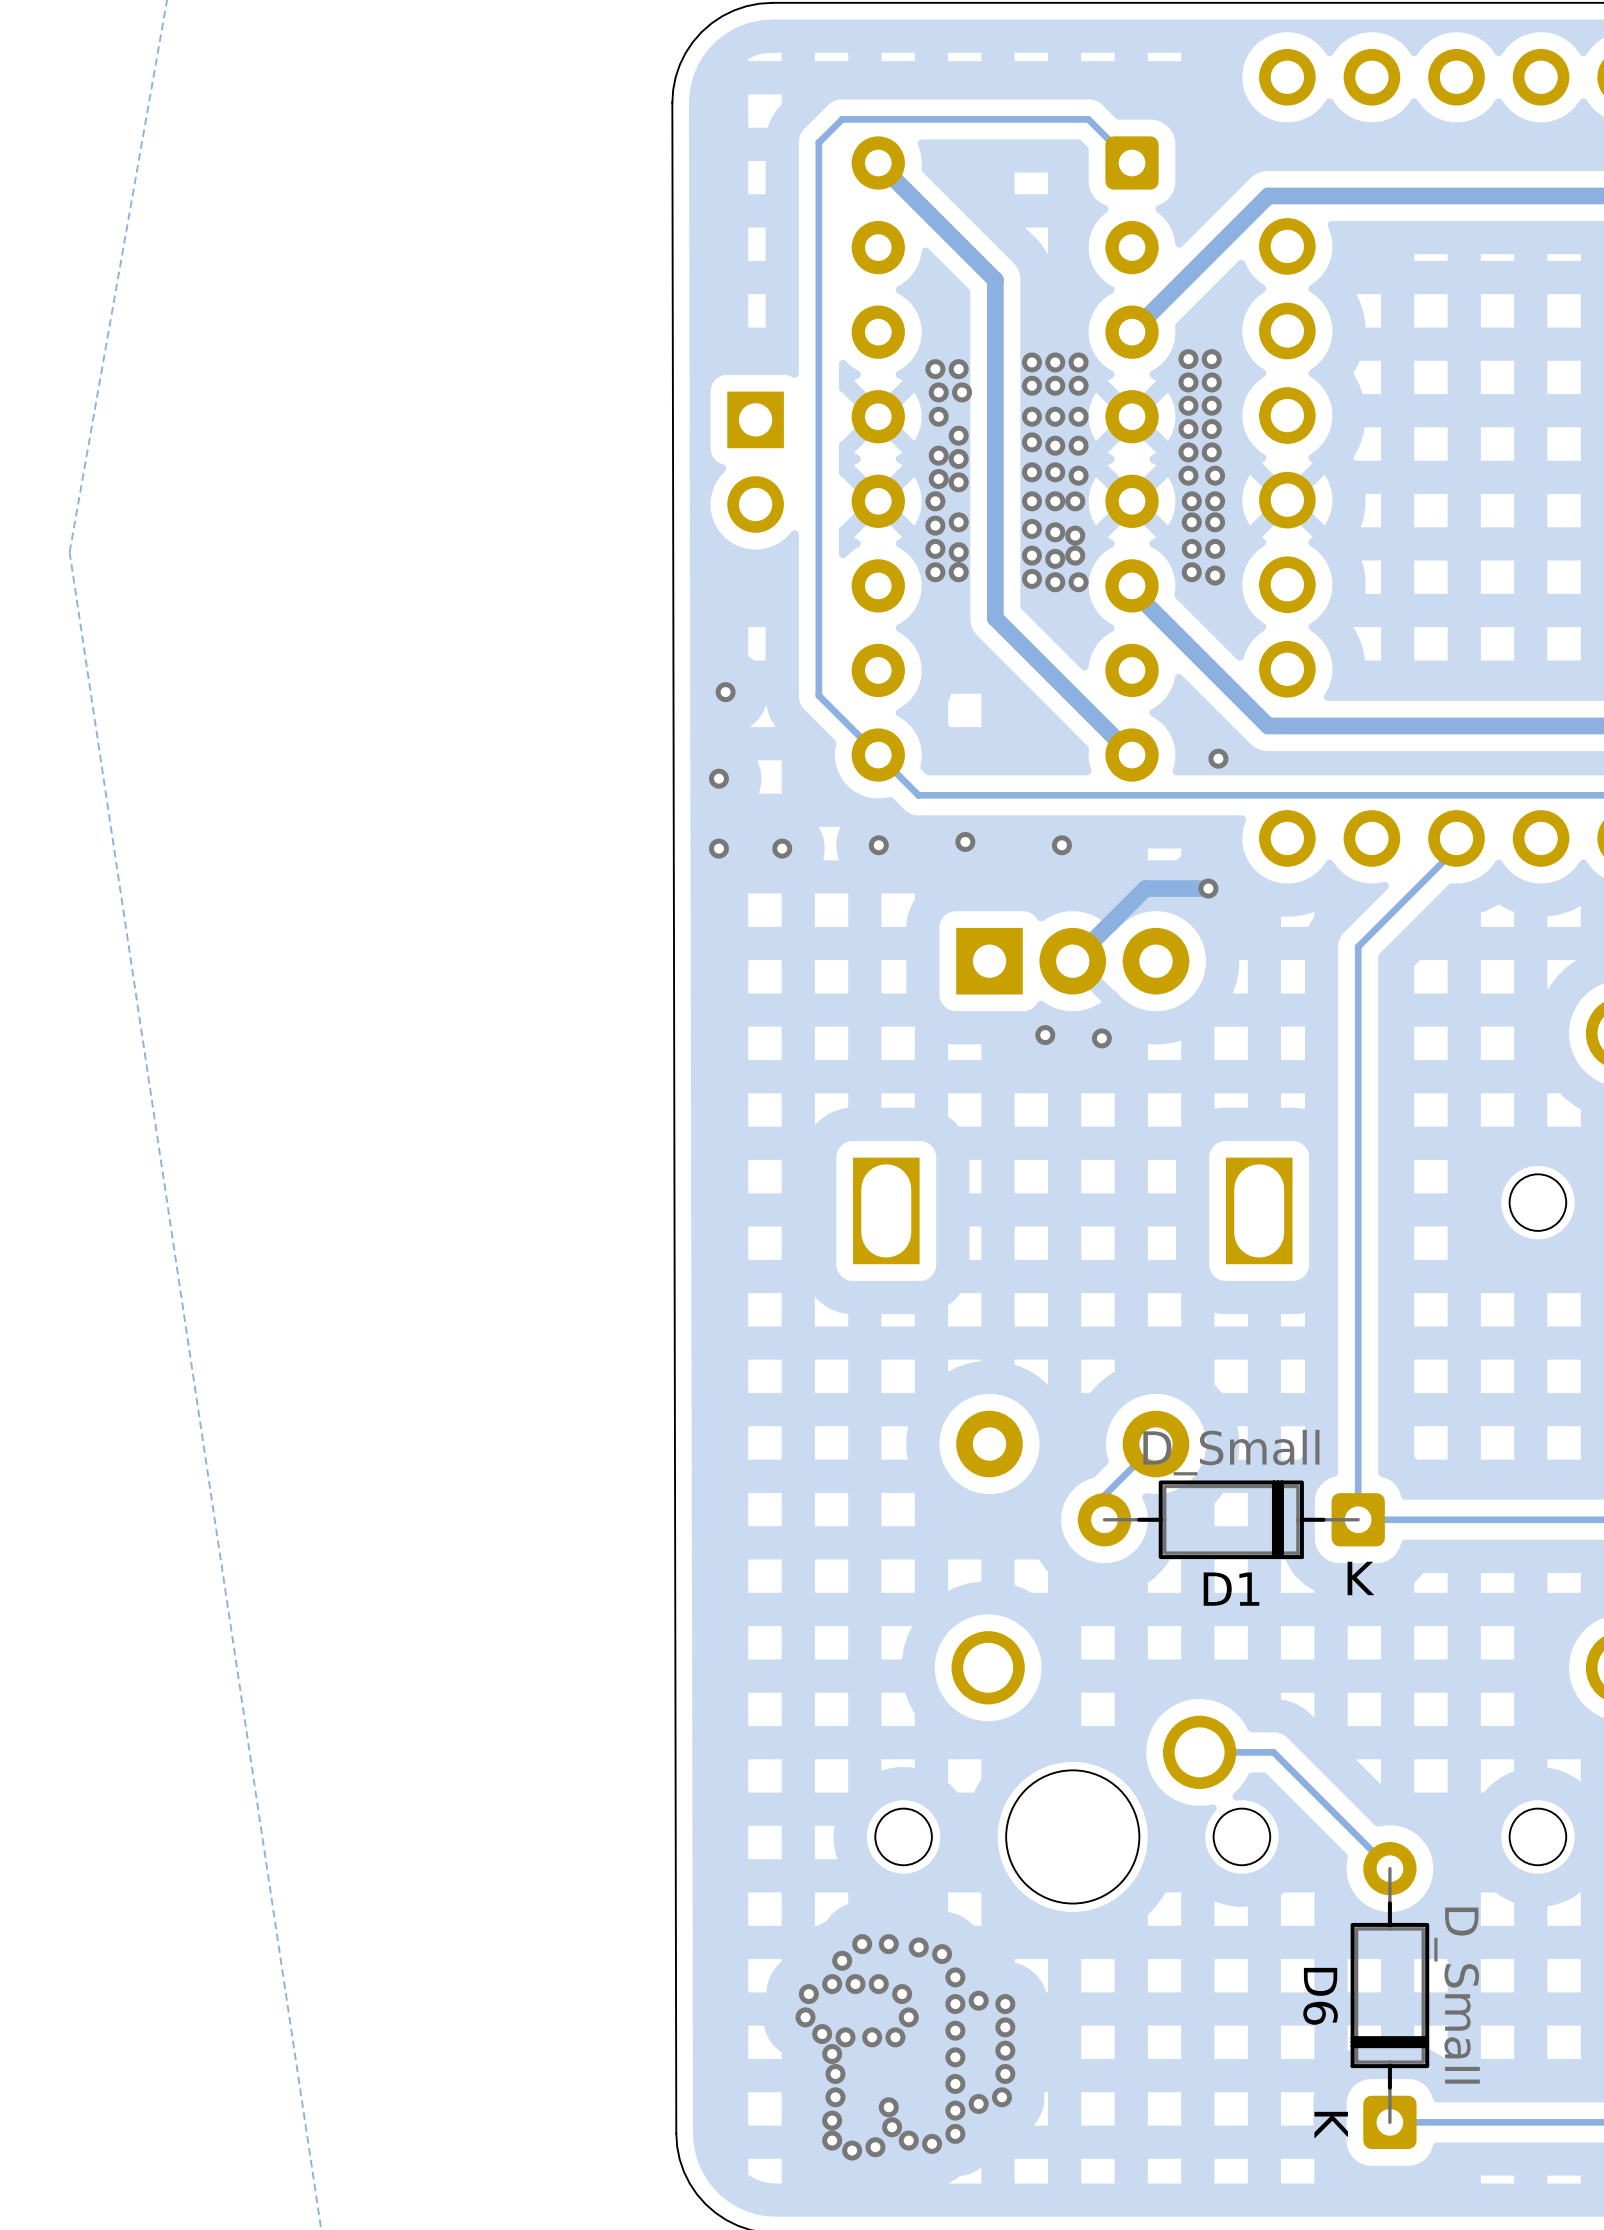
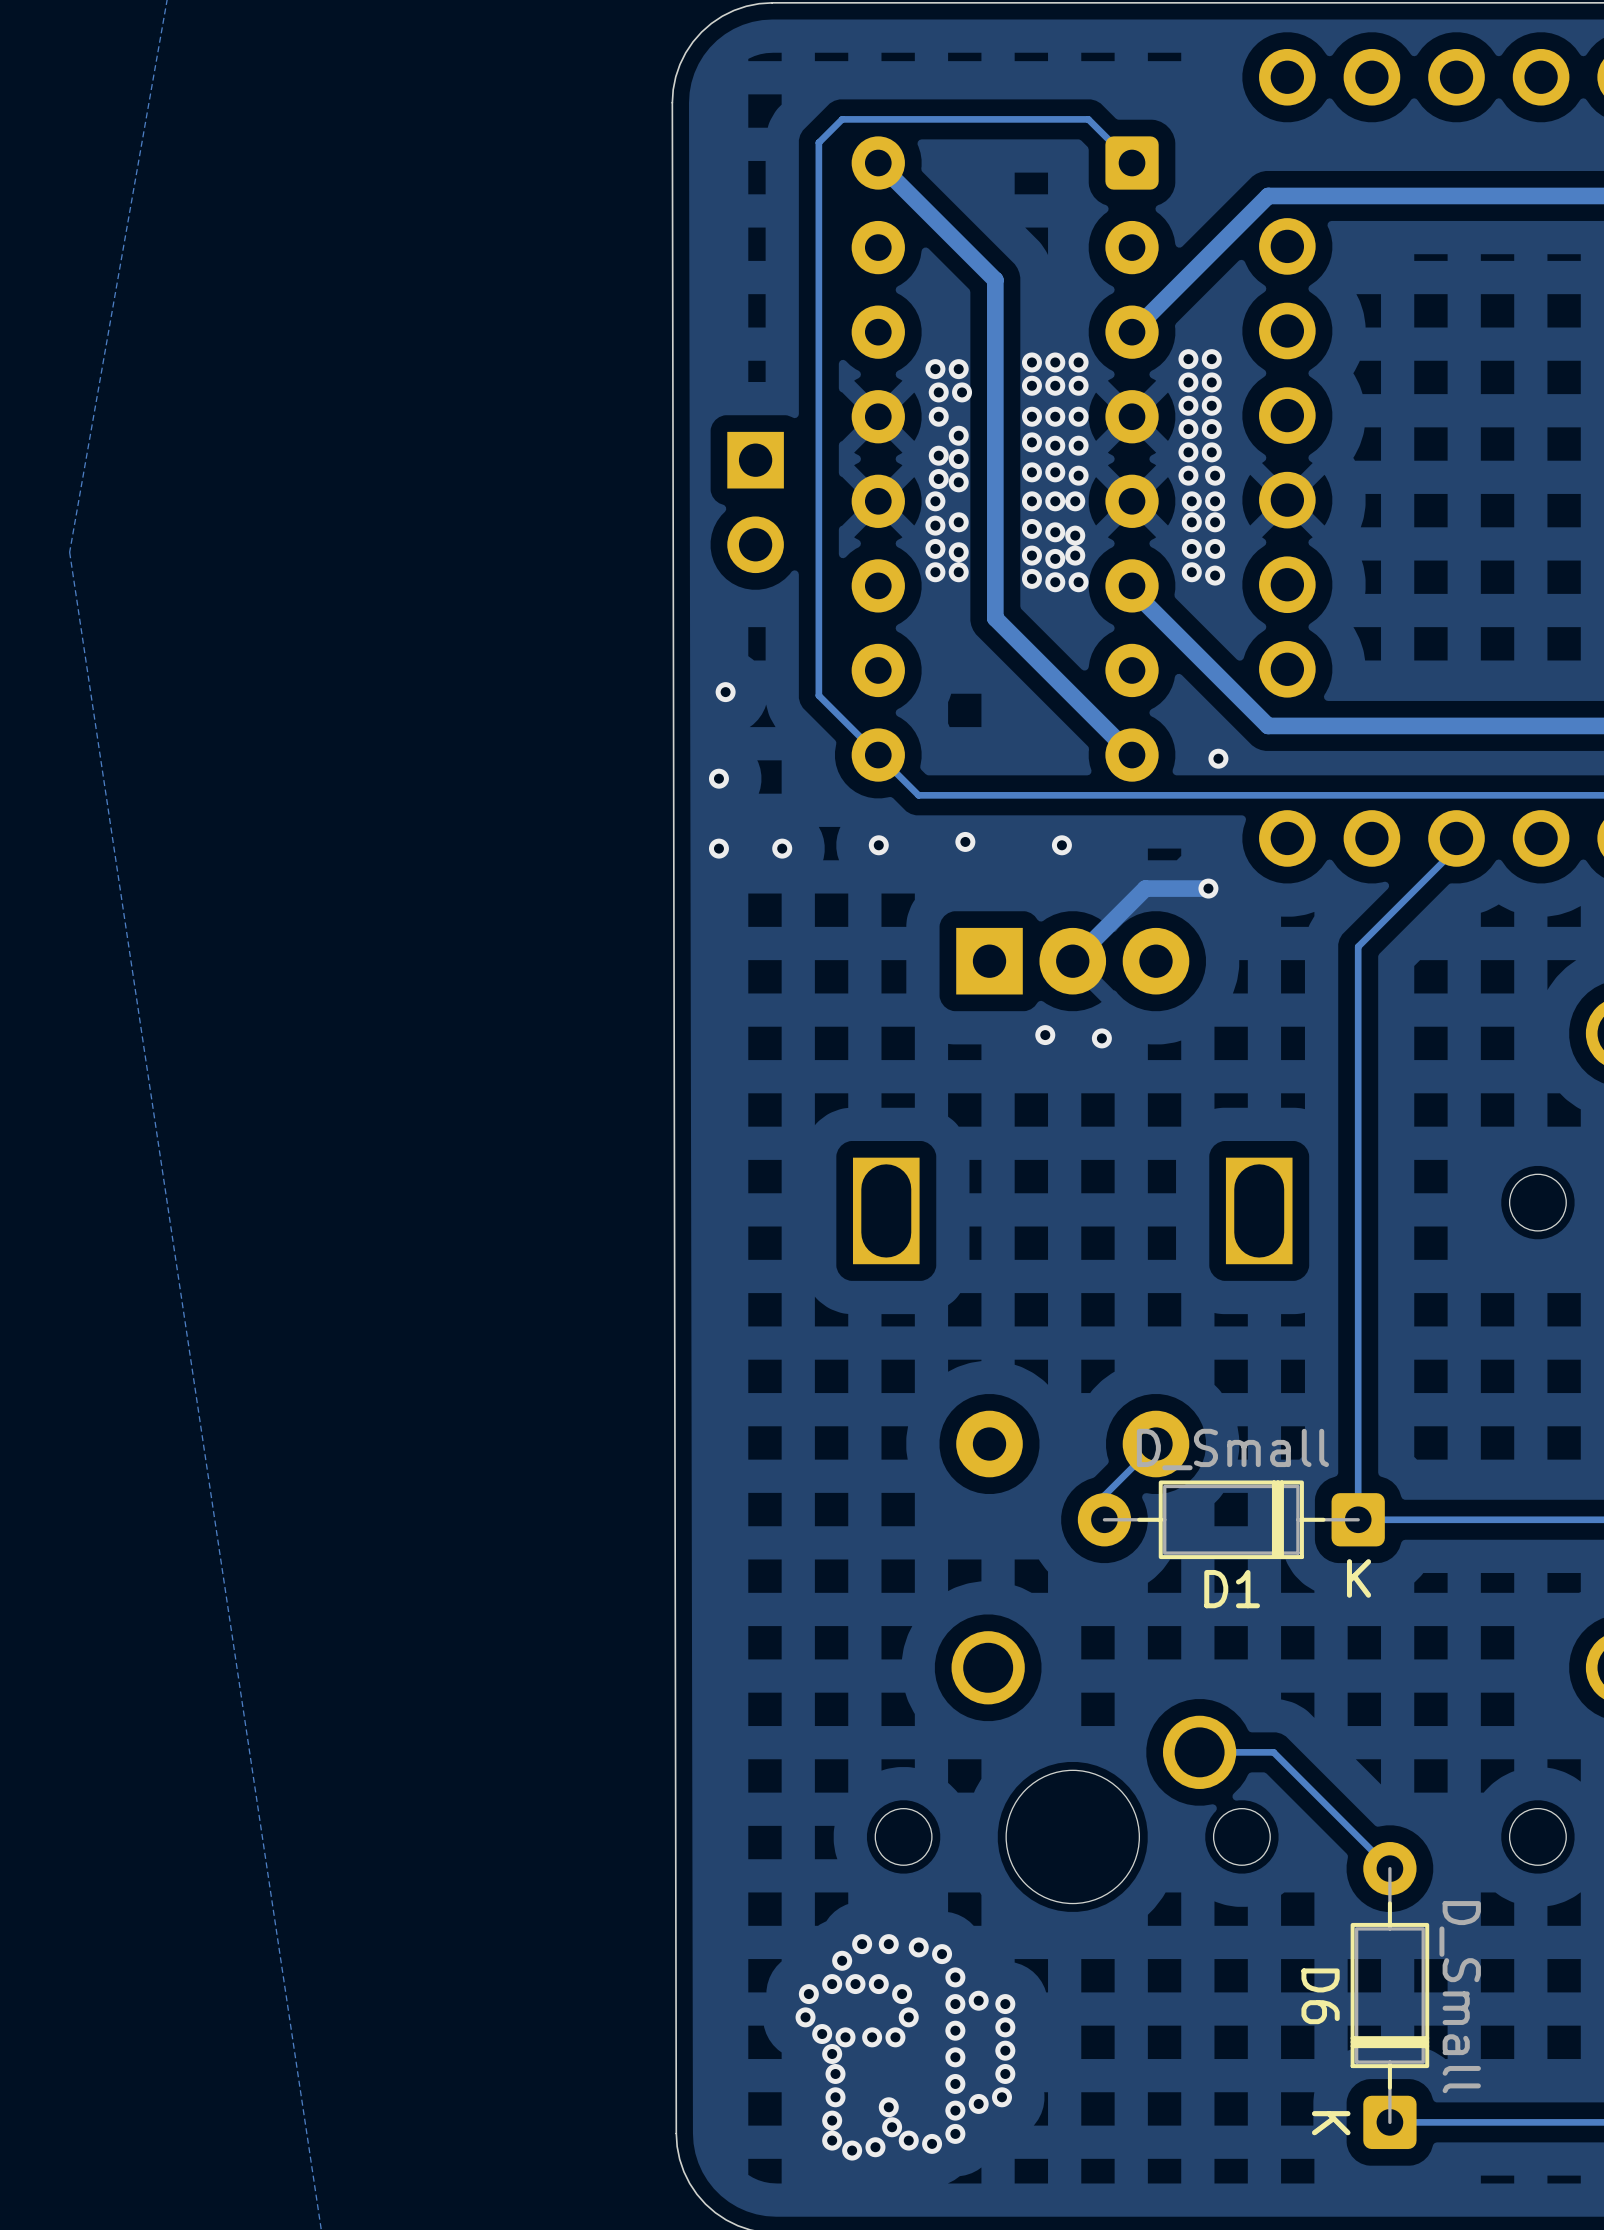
part position: (755, 462) -> (755, 502)

